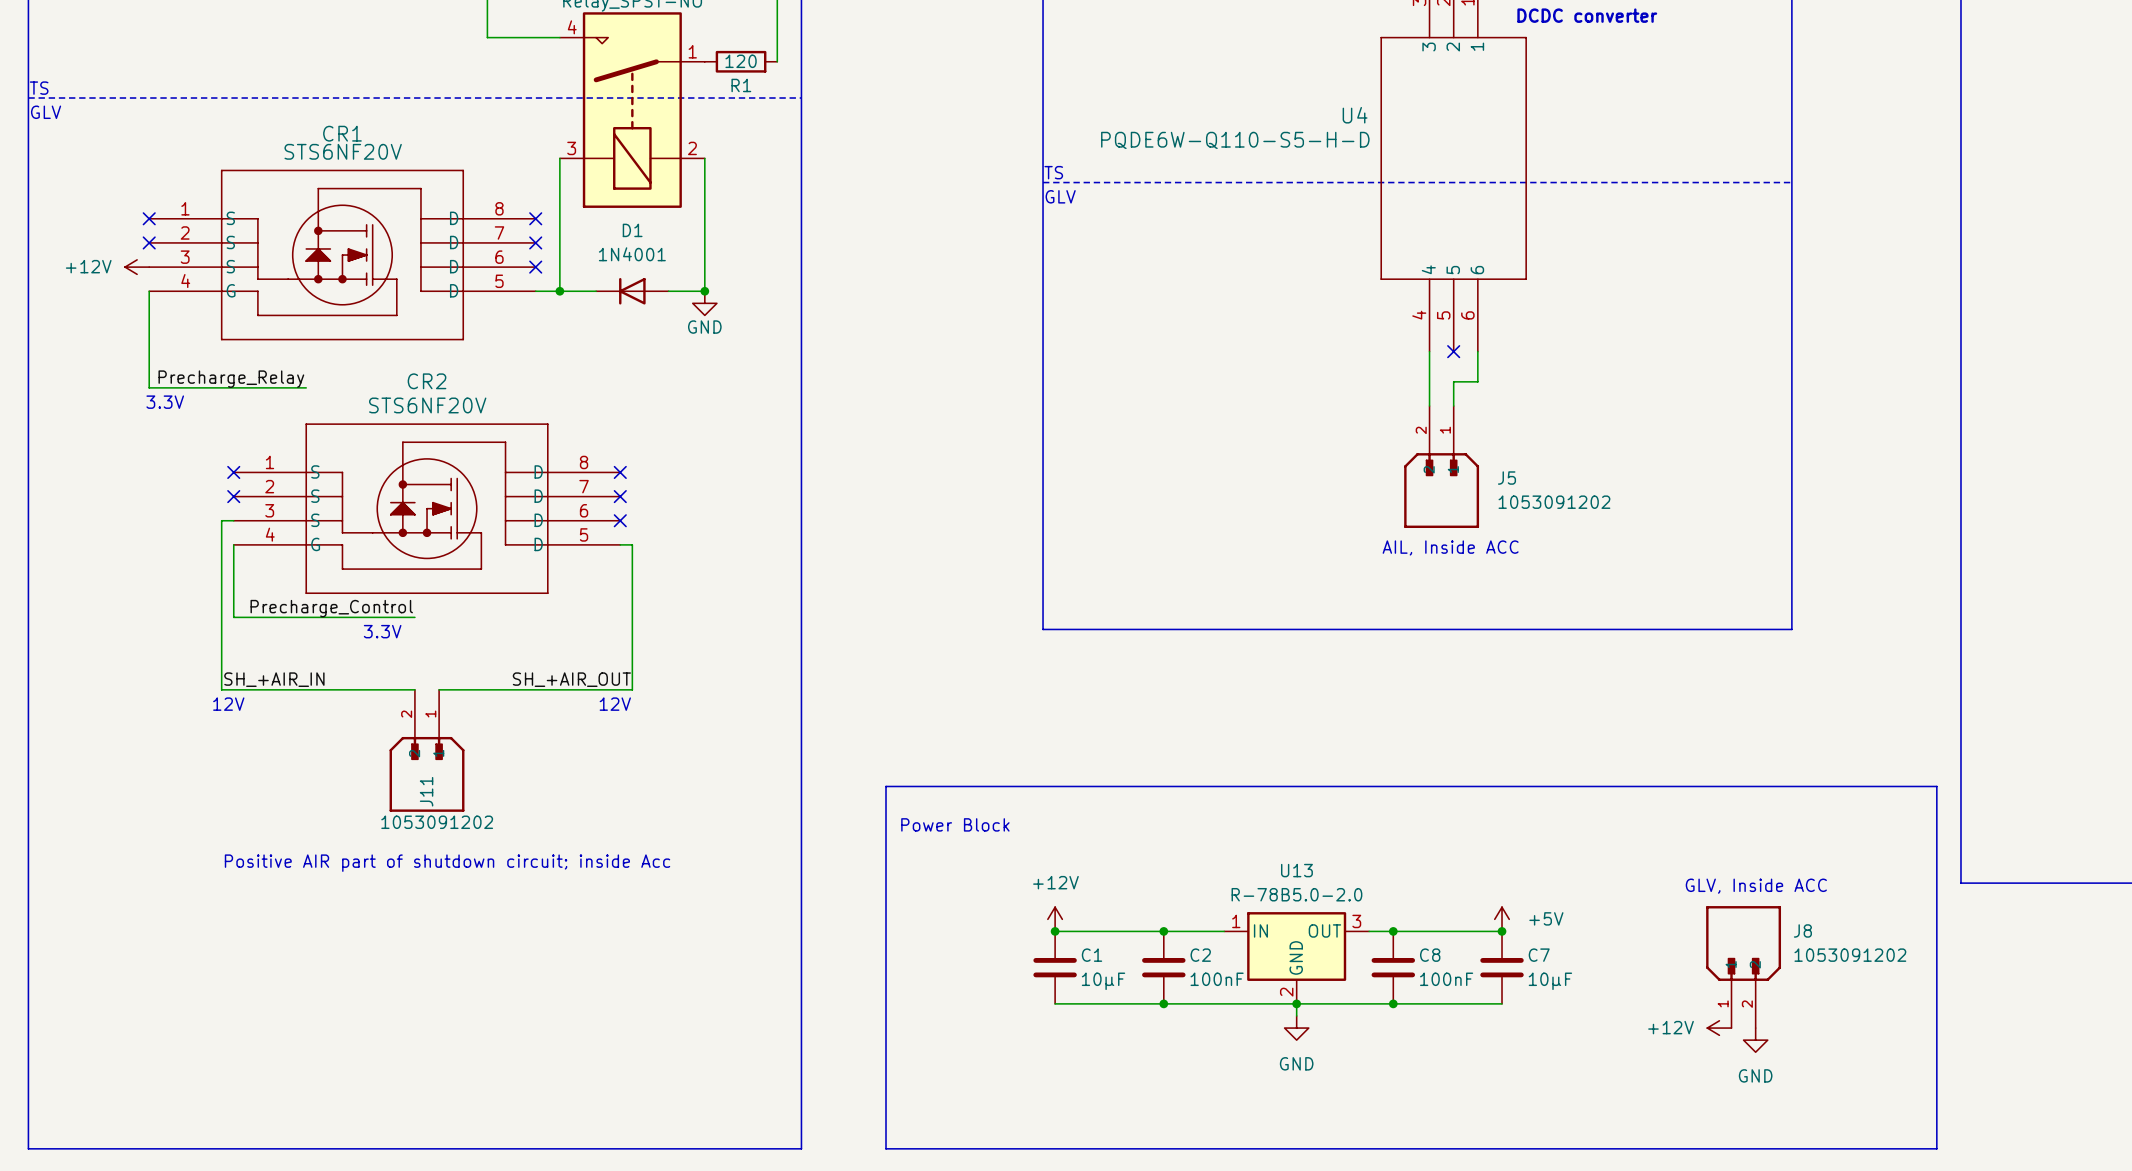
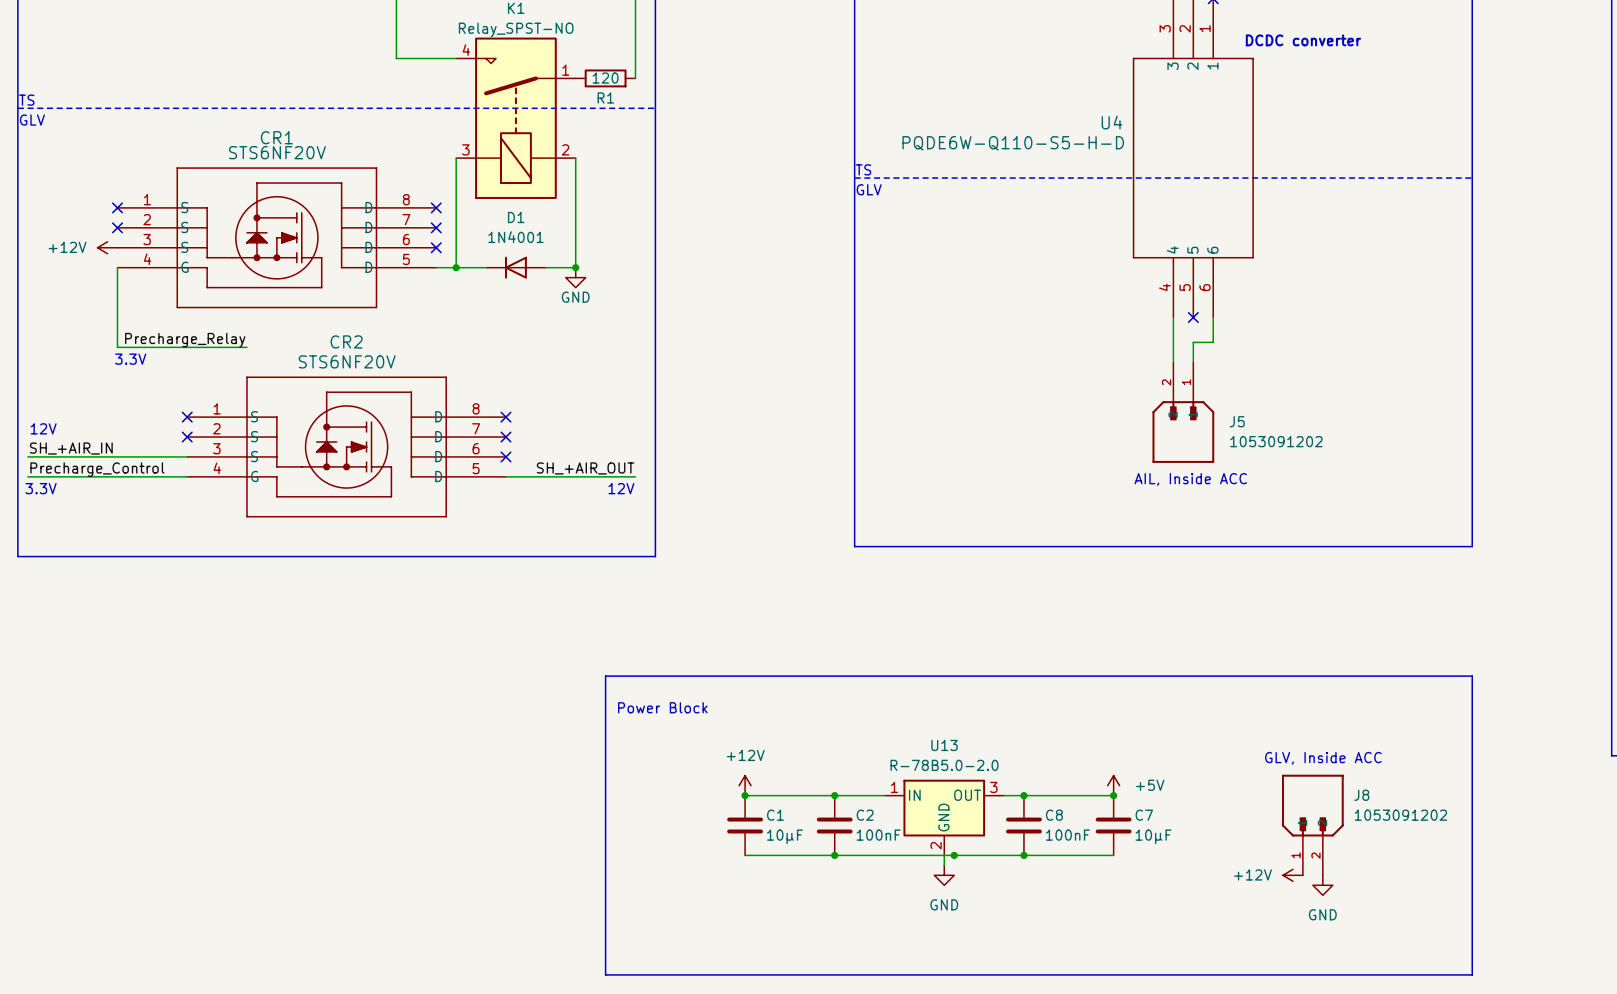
text: none -> 12V (43, 428)
label: none -> SH_+AIR_IN (71, 448)
wire: (221, 520) (221, 689) (414, 689) -> (177, 456) (27, 456)
label: none -> Precharge_Control (97, 469)
wire: (233, 544) (233, 617) (414, 617) -> (187, 476) (27, 476)
wire: (632, 544) (632, 689) (439, 689) -> (515, 476) (635, 476)
text: none -> 3.3V (41, 488)
label: Precharge_Control (331, 608) -> none
text: 3.3V (382, 631) -> none
line: (28, 641) (28, 1148) (741, 1148) -> (17, 556) (655, 556)
line: (801, 641) (801, 1148) -> (725, 974) (655, 974)
label: SH_+AIR_IN (274, 679) -> none
label position: SH_+AIR_OUT (571, 679) -> SH_+AIR_OUT (585, 468)
text: 12V (228, 704) -> none
text position: 12V (615, 704) -> 12V (621, 488)
J11: 1053091202 (427, 750) -> none
line: (886, 786) (886, 1148) -> (725, 676) (605, 676) (605, 974)
line: (1791, 786) (1936, 786) (1936, 1148) (1791, 1148) -> (1472, 676) (1472, 974)
text position: Power Block (955, 824) -> Power Block (662, 707)
text: Positive AIR part of shutdown circuit; inside Acc (447, 863) -> none
text position: GLV, Inside ACC (1756, 886) -> GLV, Inside ACC (1323, 758)
power symbol position: +12V (1055, 919) -> +12V (745, 785)
power symbol position: +5V (1502, 919) -> +5V (1113, 785)
wire: none -> (745, 795) (864, 795)
junction: none -> (745, 795)
junction position: (1055, 931) -> (834, 795)
junction: (1163, 931) -> none
junction: none -> (1023, 795)
wire: (1369, 931) (1502, 931) -> none
junction position: (1393, 931) -> (1113, 795)
junction: (1502, 931) -> none
U13 position: (1296, 957) -> (944, 817)
C1 position: (1055, 967) -> (745, 825)
C2 position: (1163, 967) -> (834, 825)
C8 position: (1393, 967) -> (1023, 825)
C7 position: (1502, 967) -> (1113, 825)
J8 position: (1743, 967) -> (1312, 825)
wire: none -> (745, 855) (864, 855)
junction: none -> (834, 855)
junction: none -> (1023, 855)
wire: (1296, 1003) (1296, 1015) -> (944, 855) (944, 865)
junction: (1296, 1003) -> none
wire: (1357, 1003) (1502, 1003) -> none
junction: (1393, 1003) -> none
power symbol position: GND (1296, 1028) -> GND (944, 875)
power symbol position: +12V (1719, 1028) -> +12V (1292, 875)
power symbol position: GND (1755, 1040) -> GND (1322, 885)

